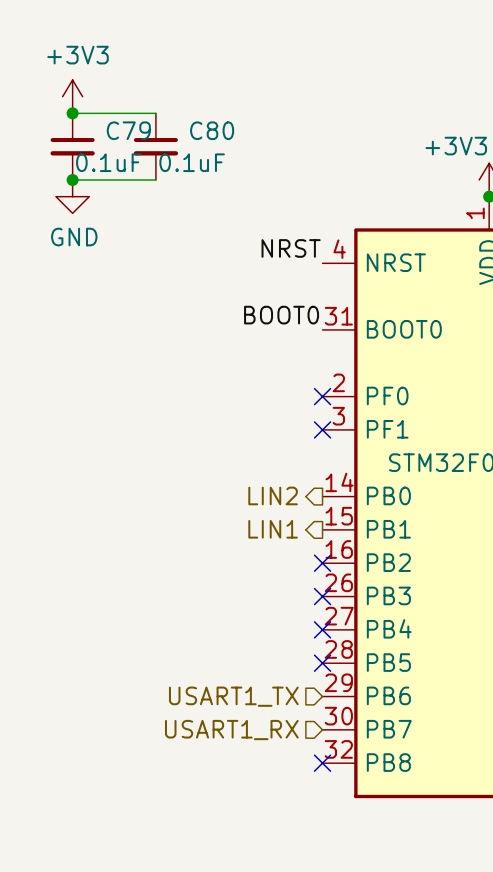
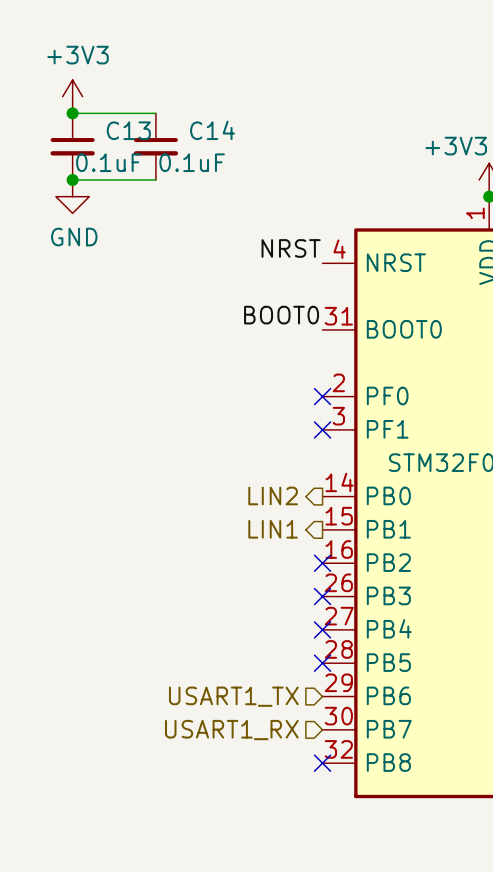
C79 name: C79 (128, 130) -> C13 (128, 130)
C80 name: C80 (212, 130) -> C14 (212, 130)

